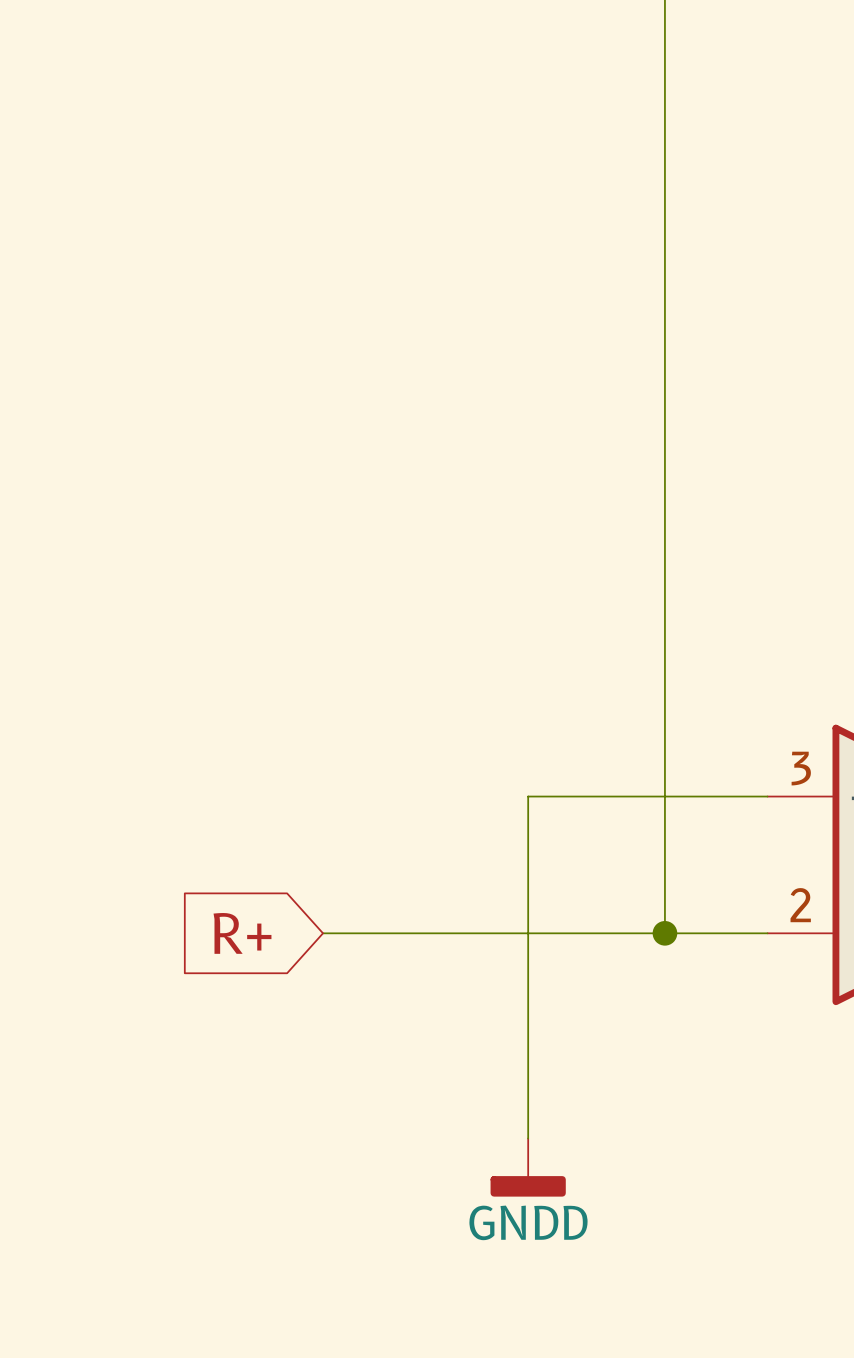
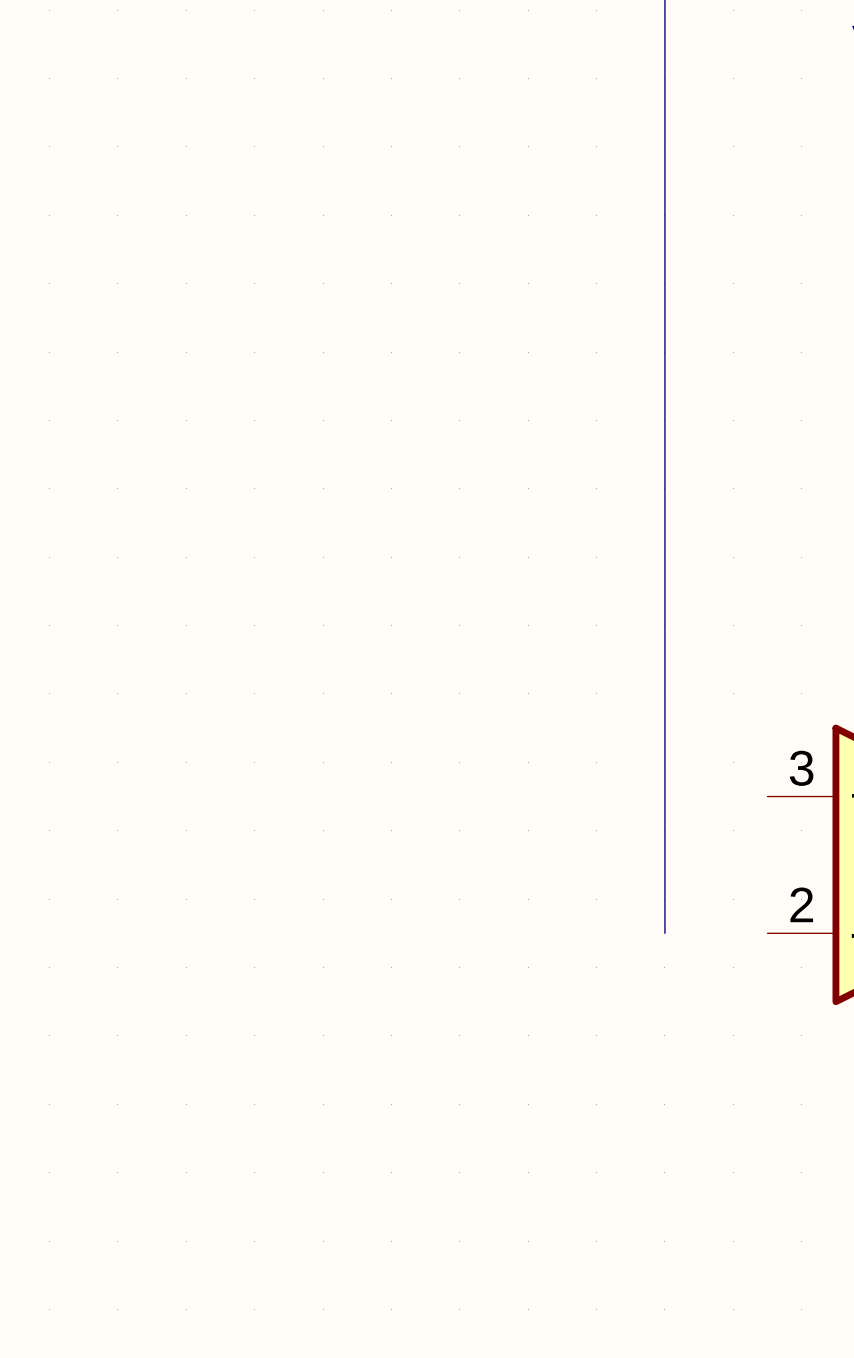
wire: (767, 796) (528, 796) (528, 1138) -> none
global label: R+ (242, 933) -> none
wire: (323, 933) (767, 933) -> none
junction: (664, 933) -> none
power symbol: GNDD (528, 1167) -> none

